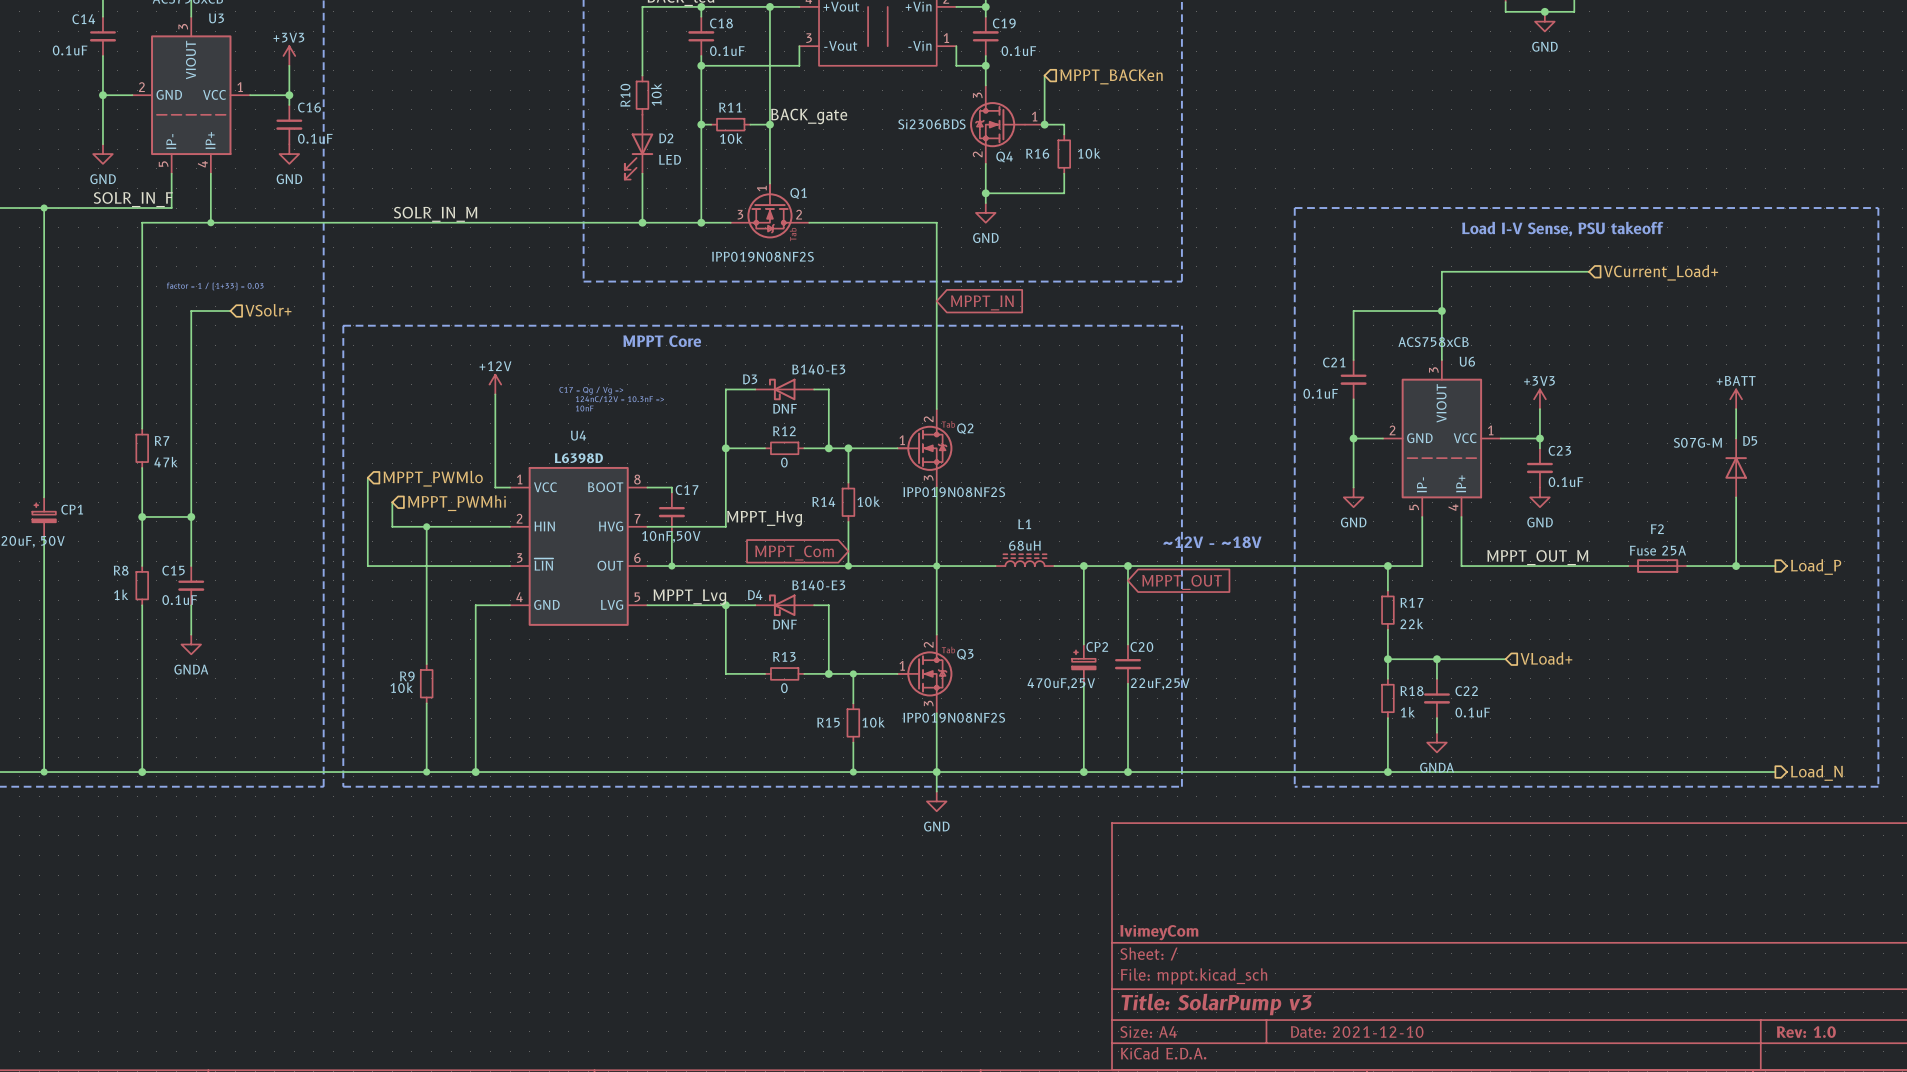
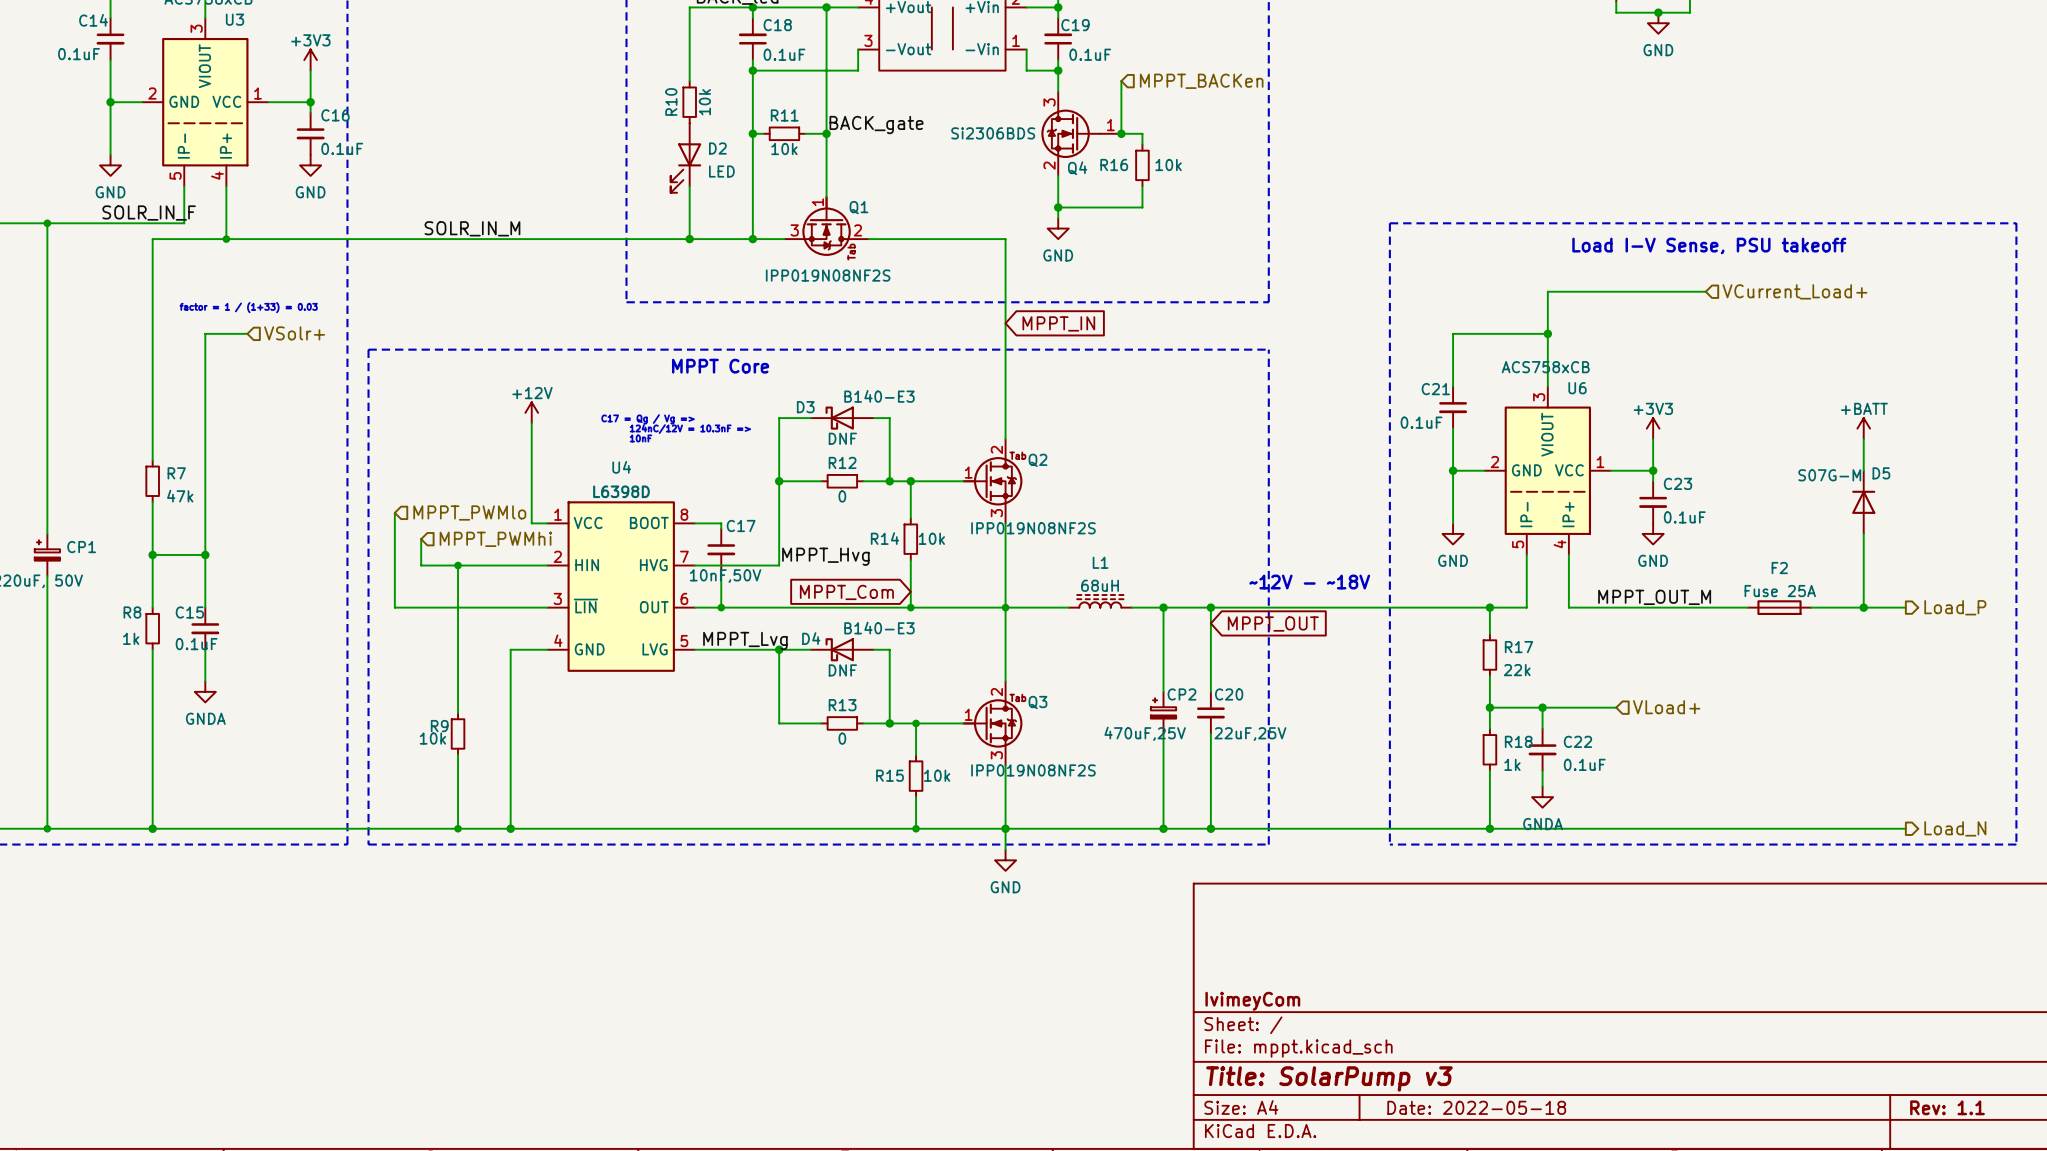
title block: Date: 2021-12-10 (1357, 1032) -> Date: 2022-05-18 (1476, 1107)
title block: Rev: 1.0 (1806, 1032) -> Rev: 1.1 (1947, 1107)

